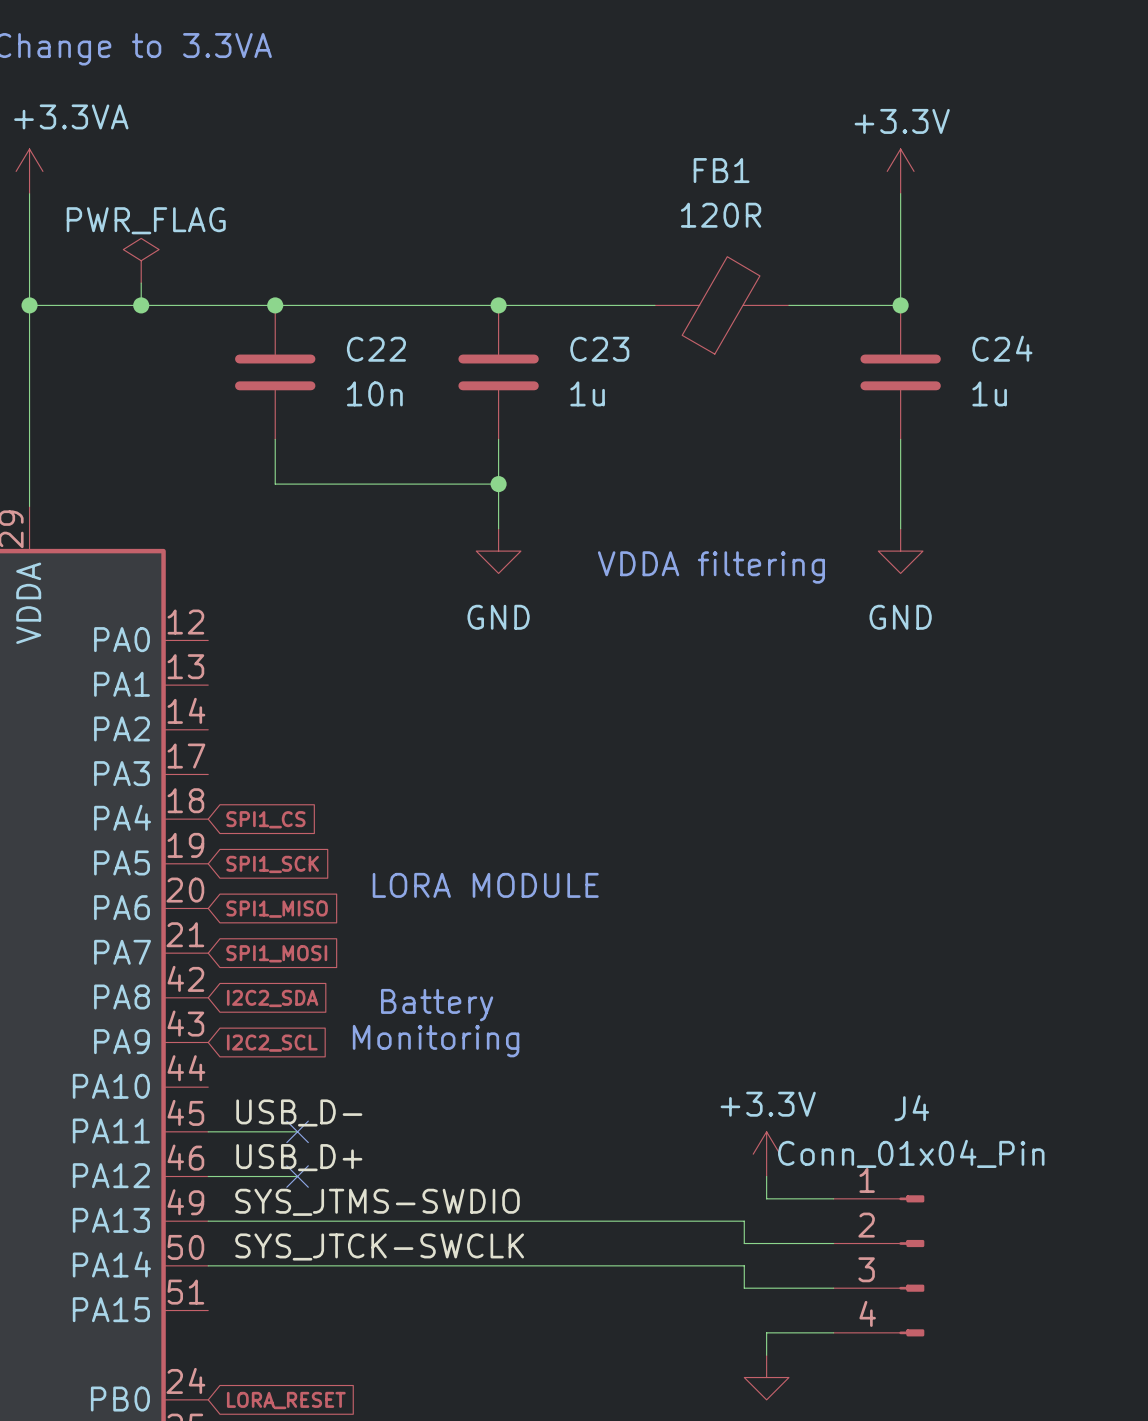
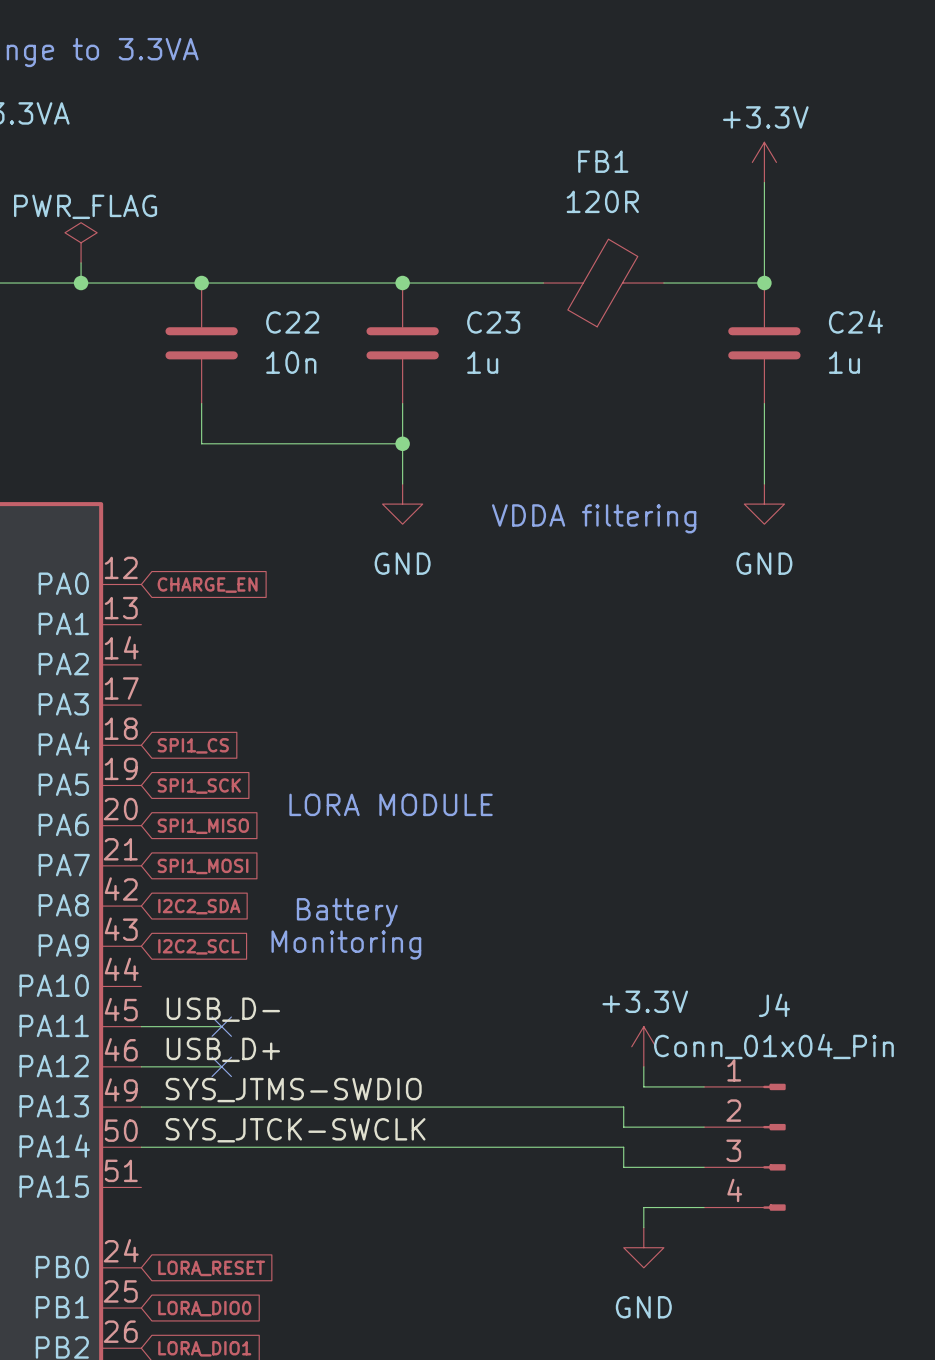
global label: none -> CHARGE_EN (207, 585)

